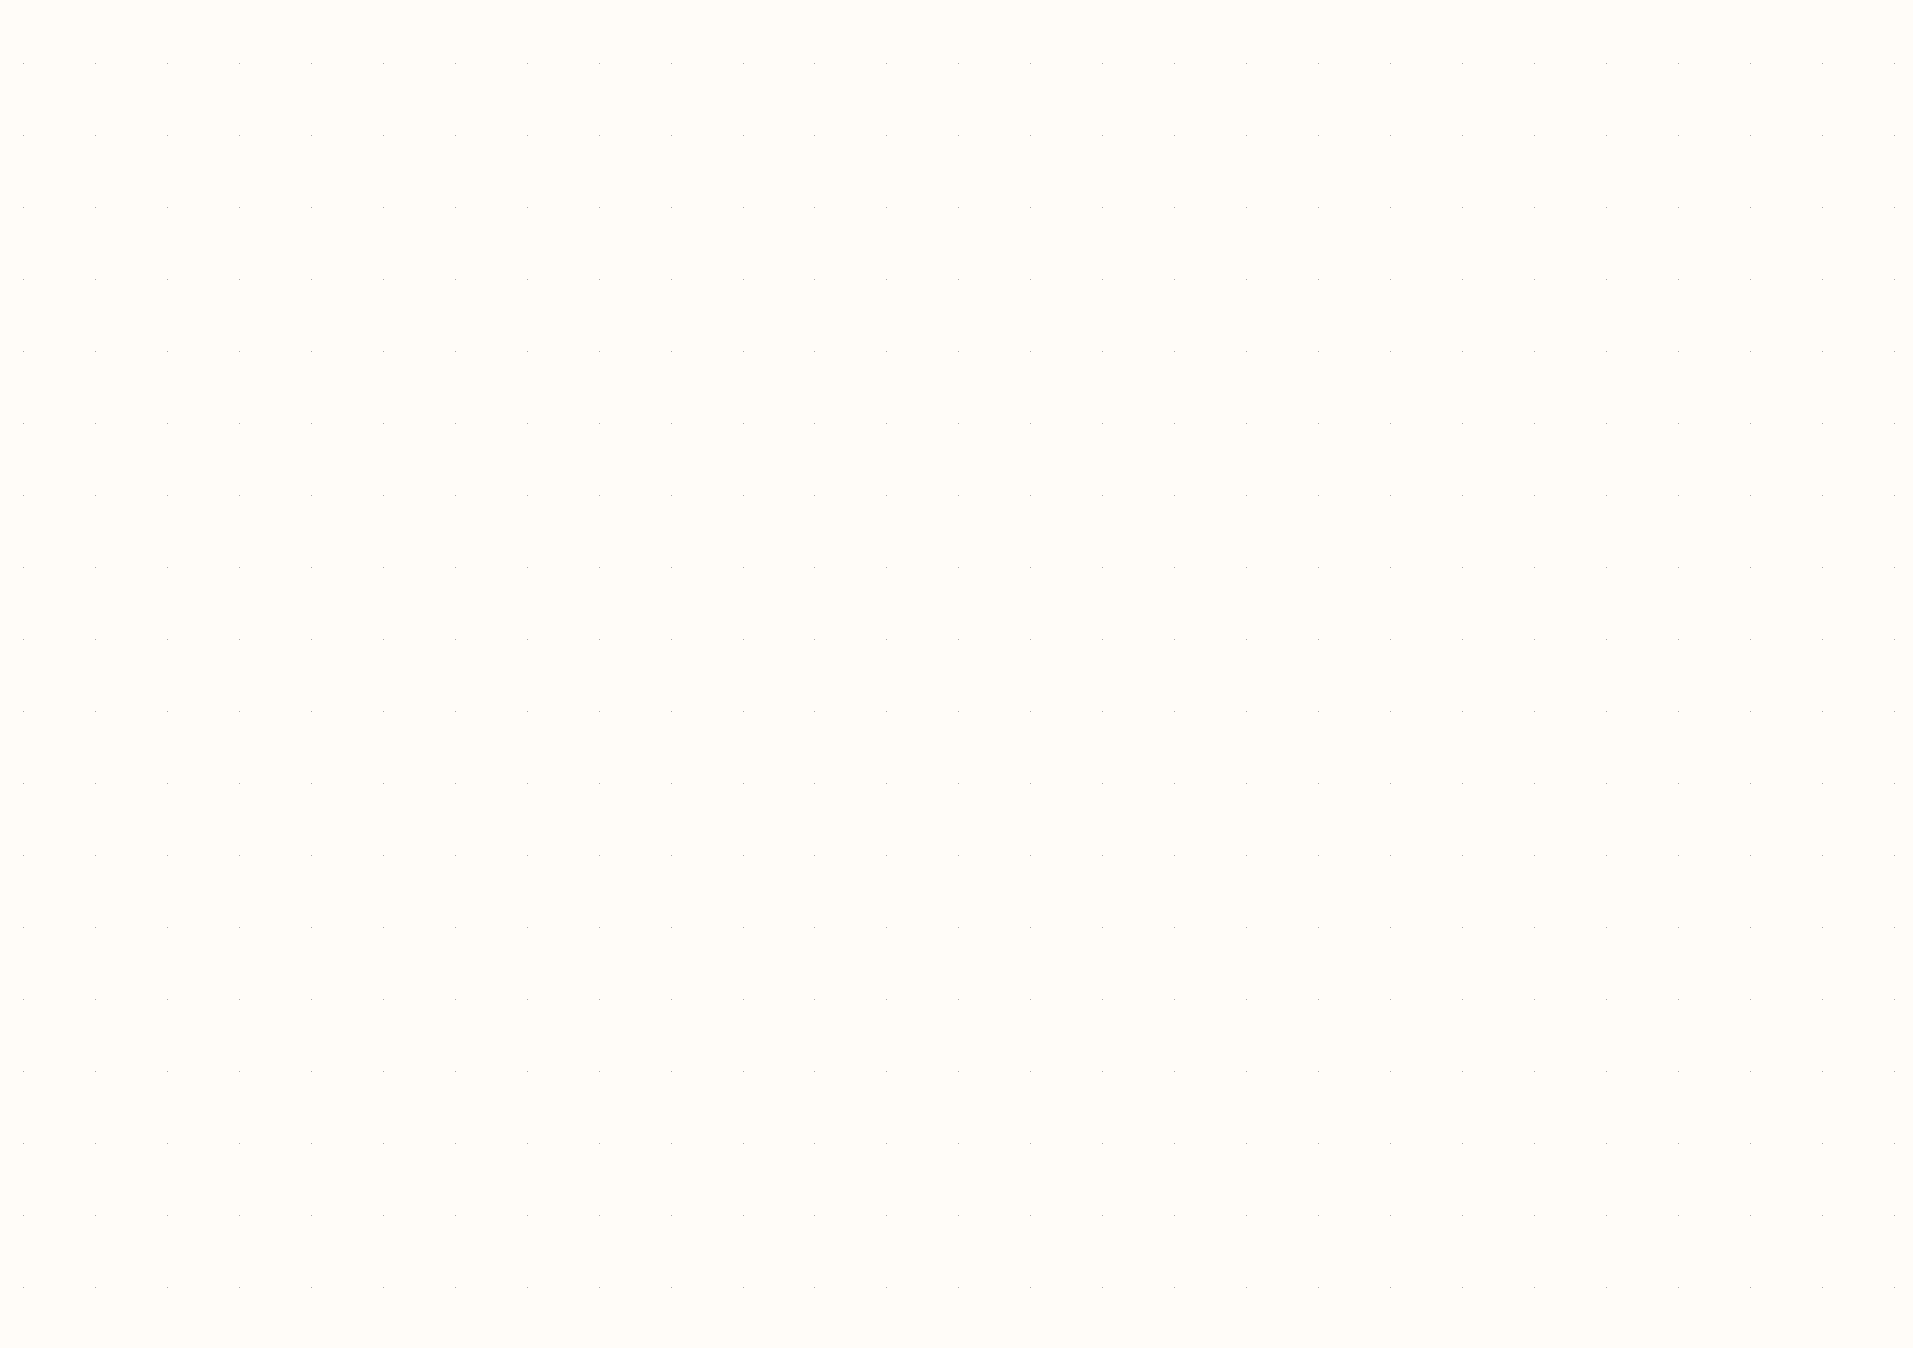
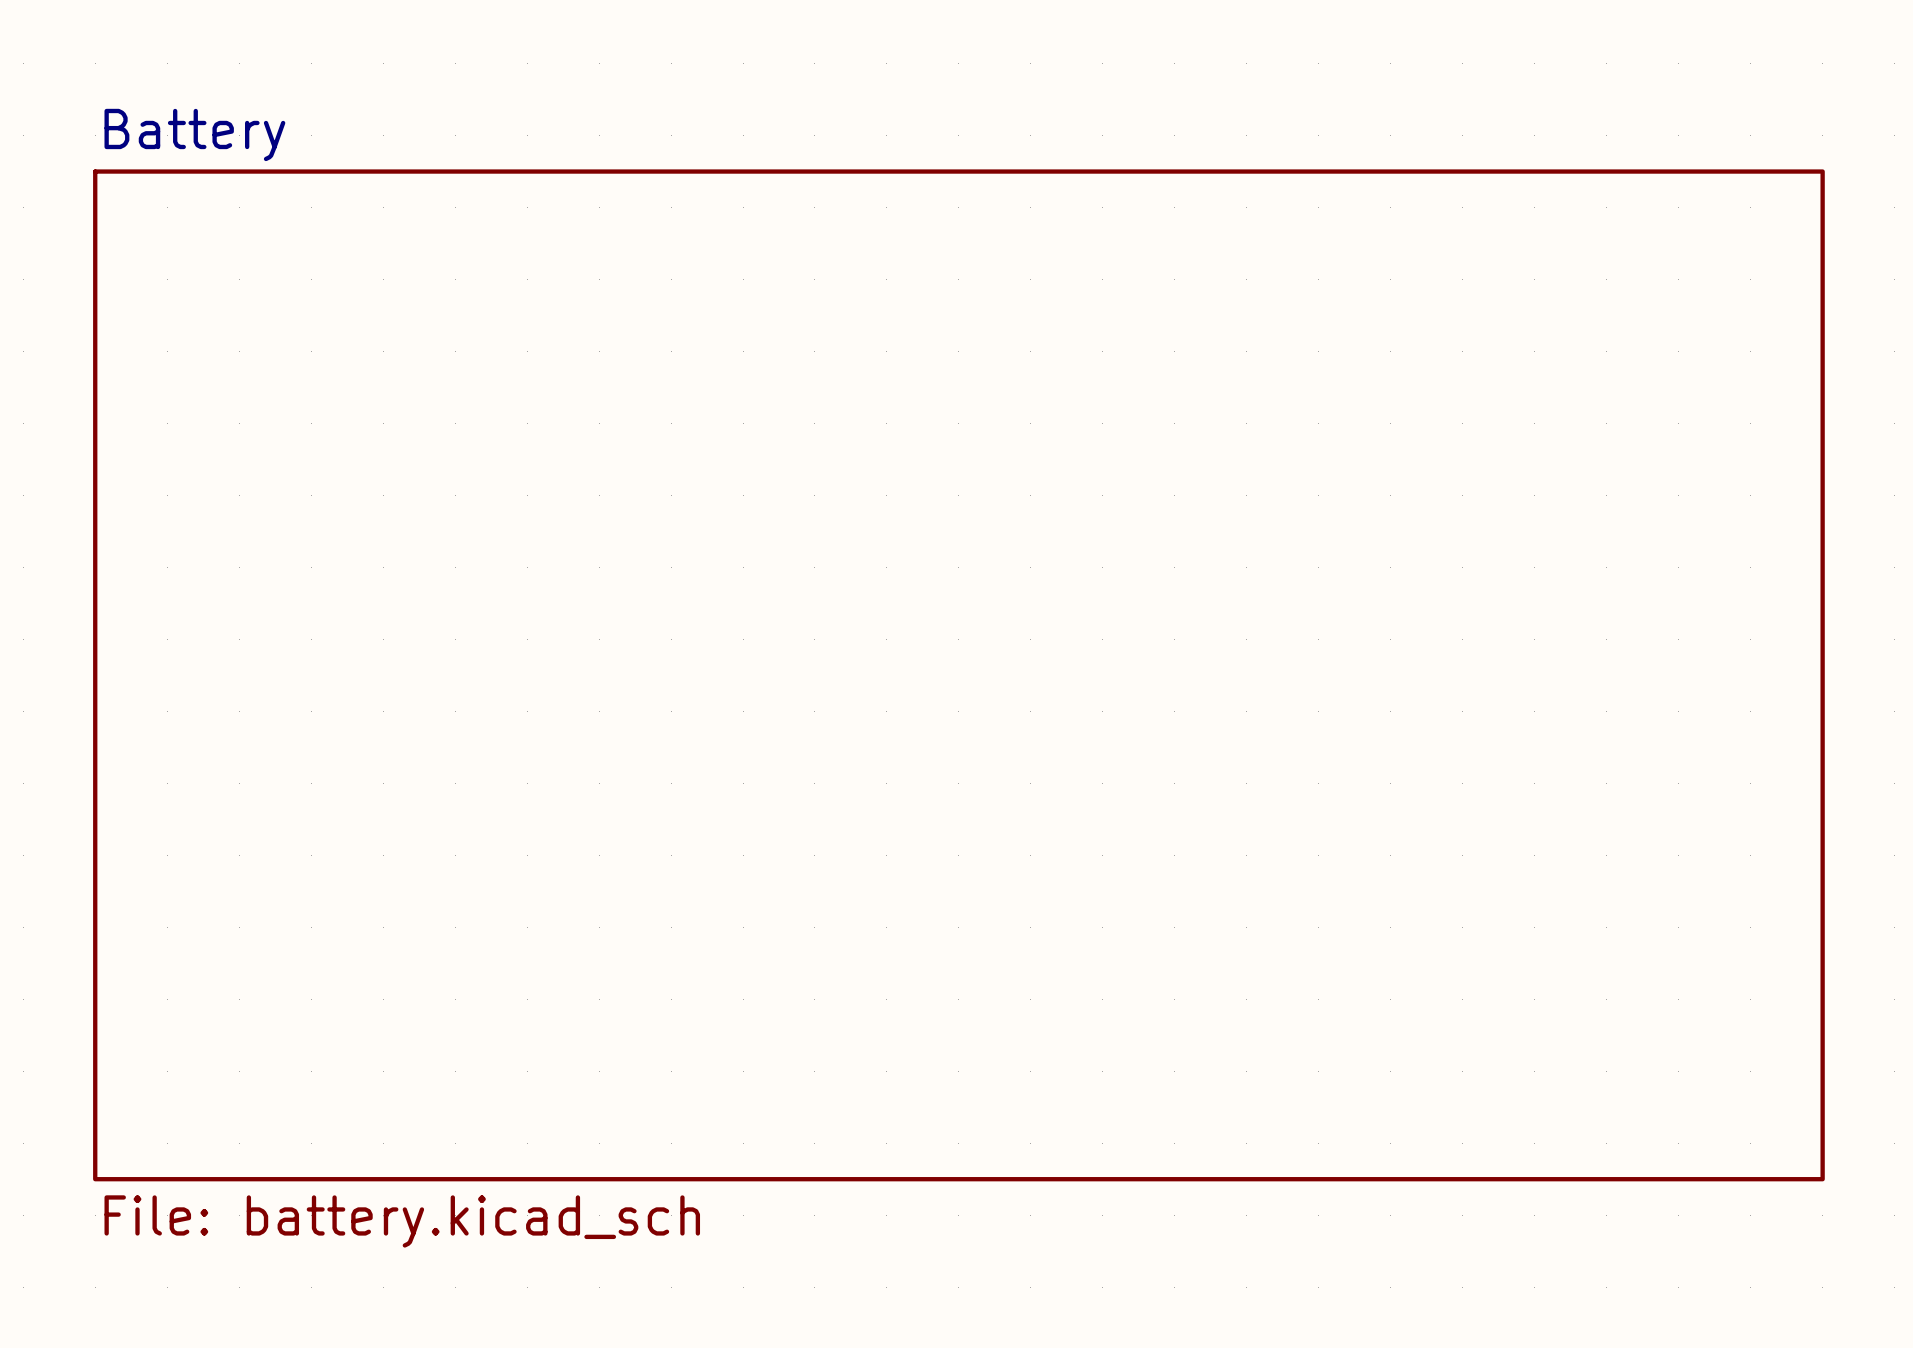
sheet Battery: none -> File: battery.kicad_sch (958, 675)

